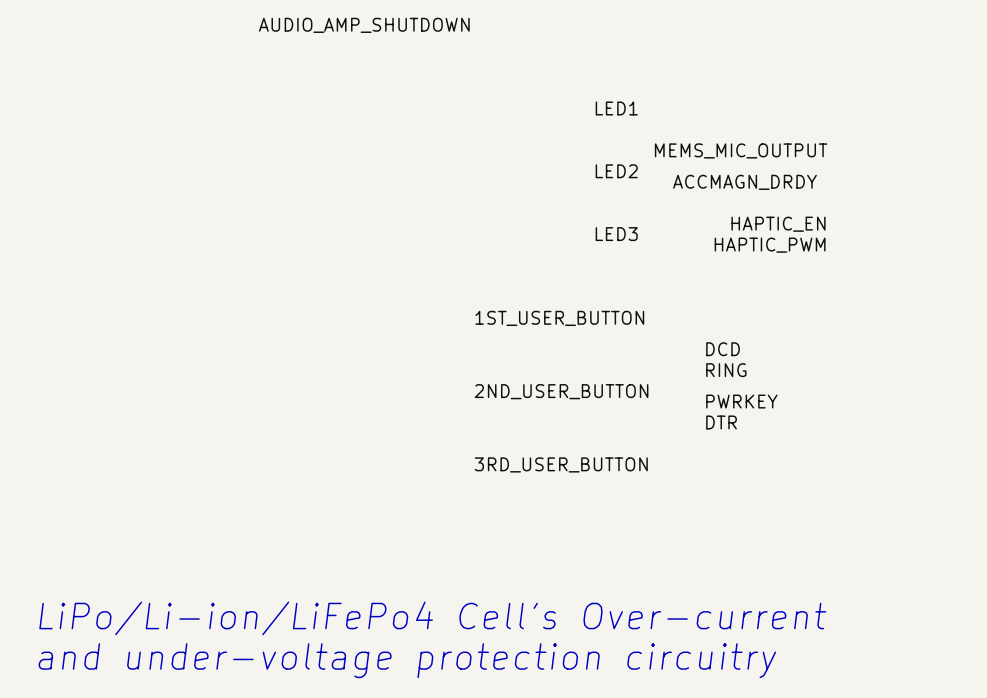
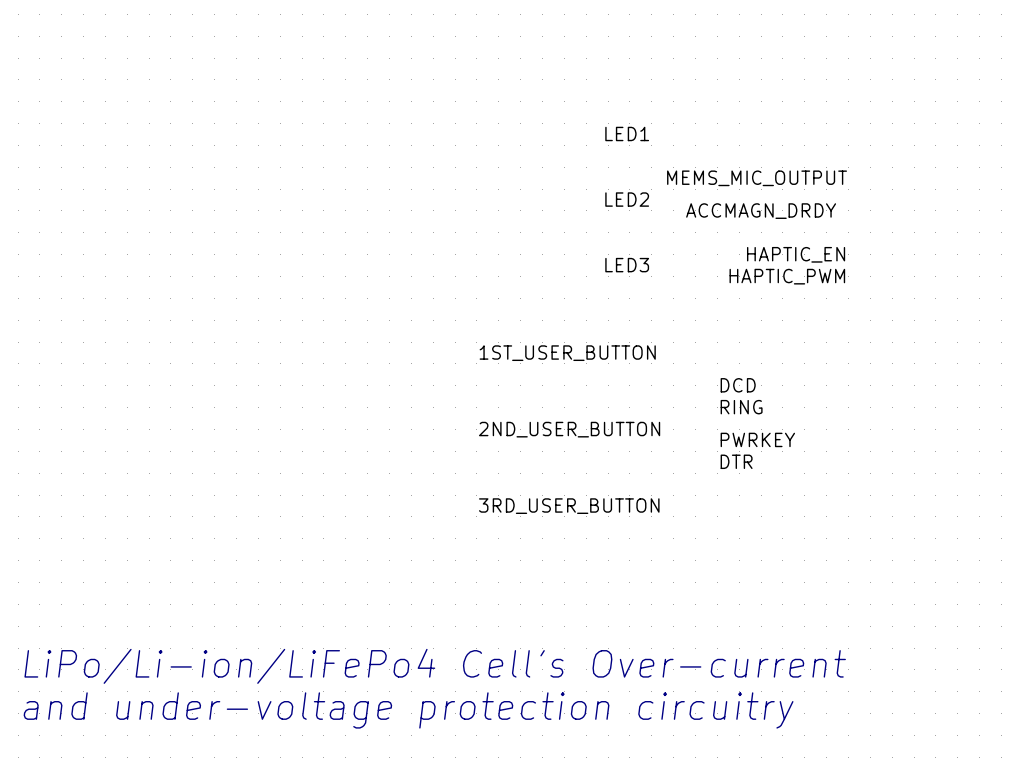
label: AUDIO_AMP_SHUTDOWN (364, 25) -> none

